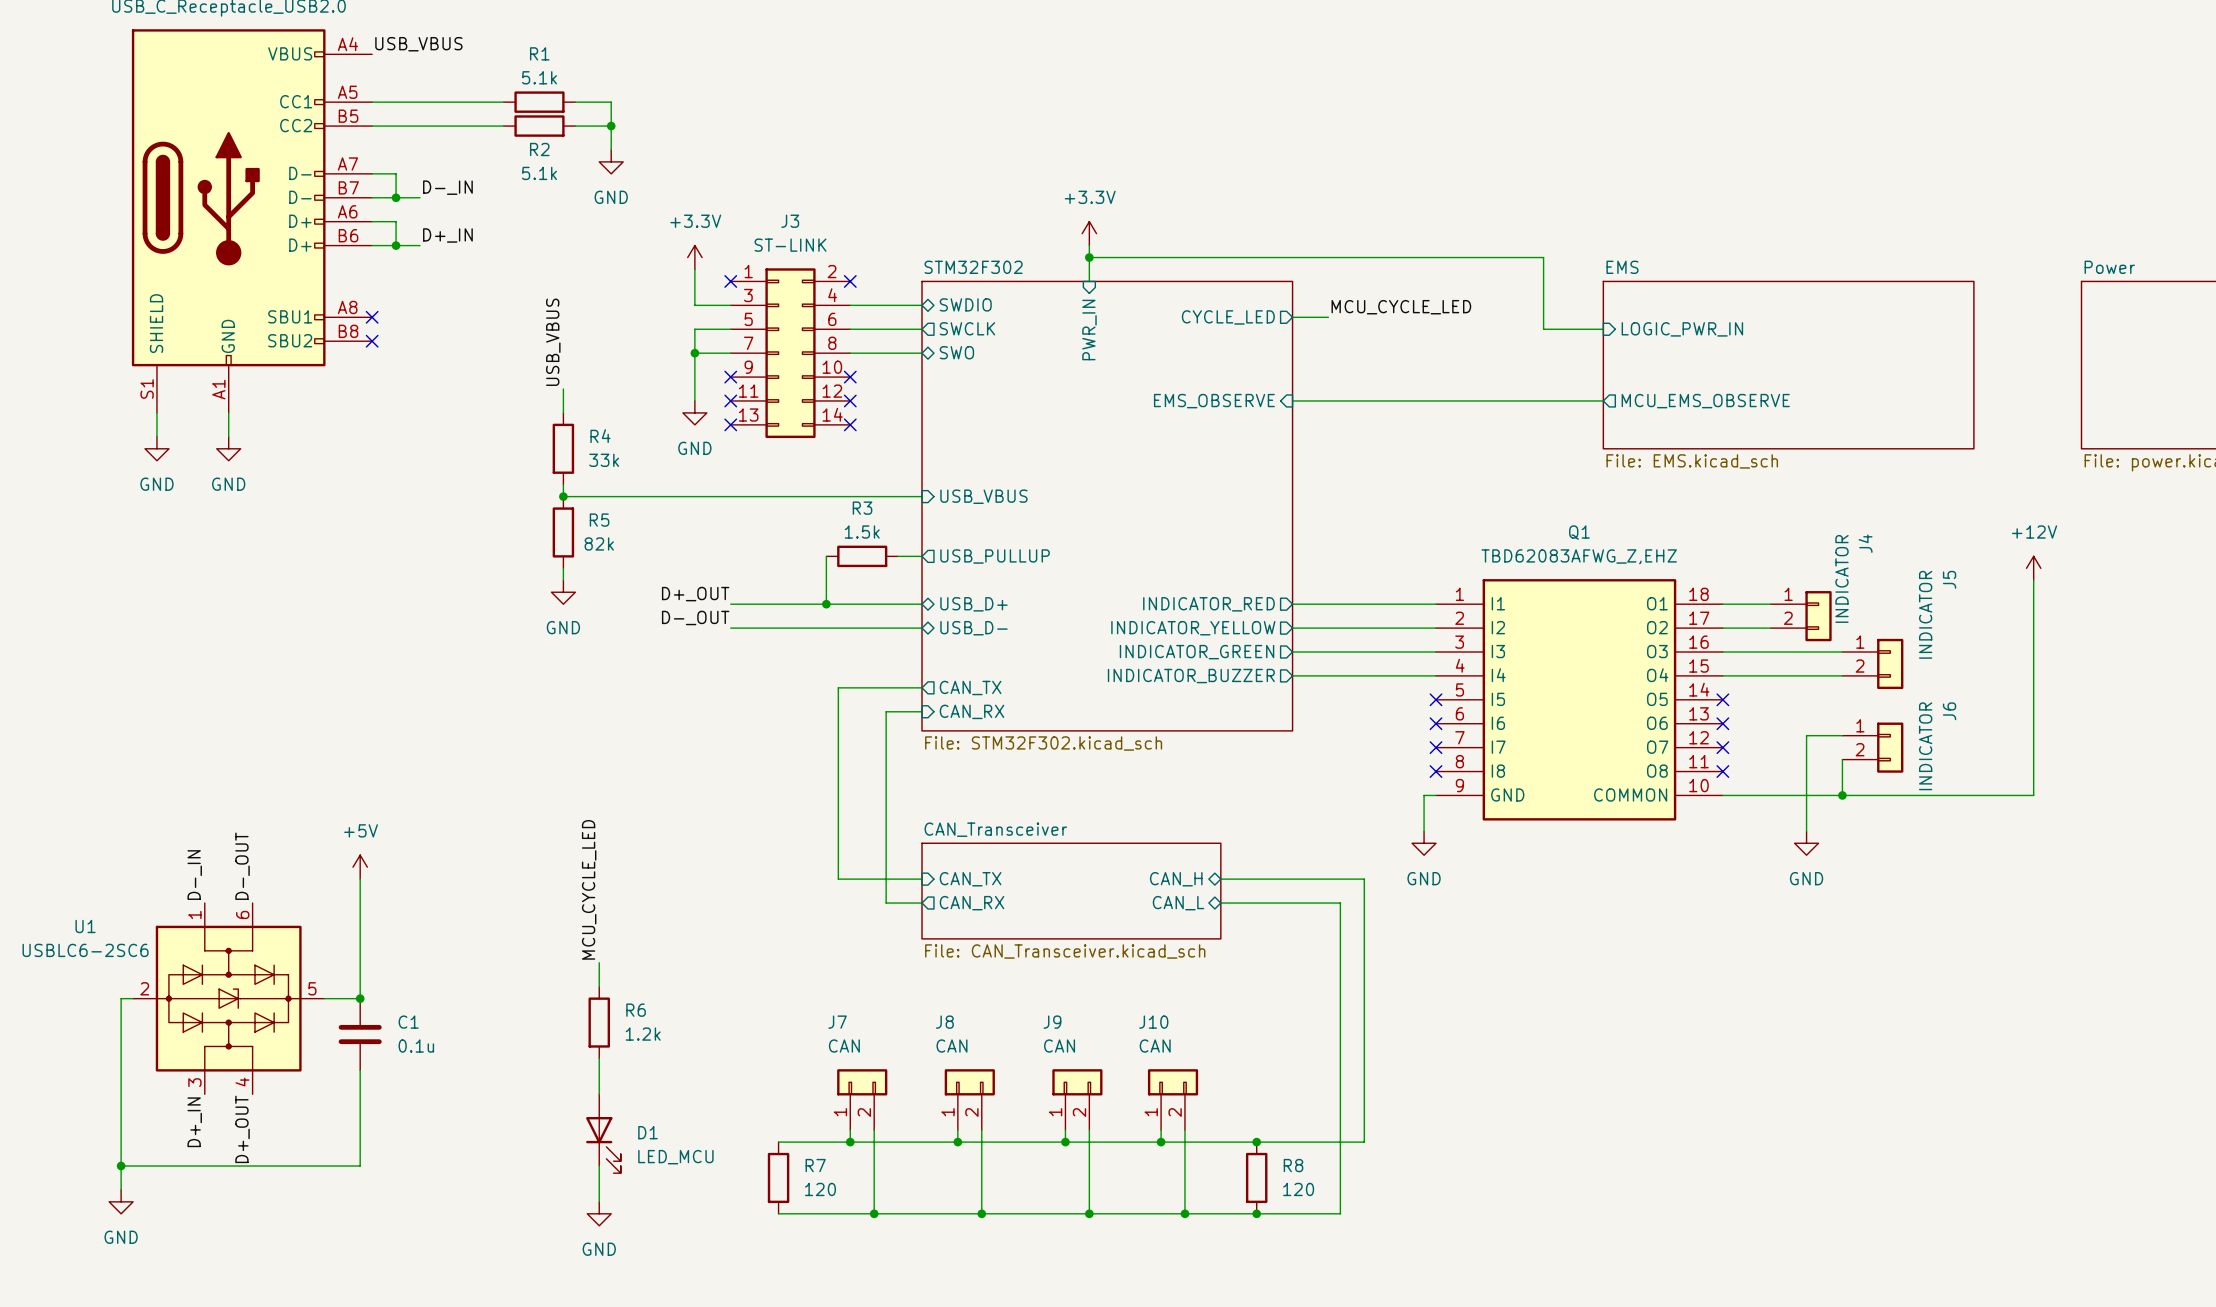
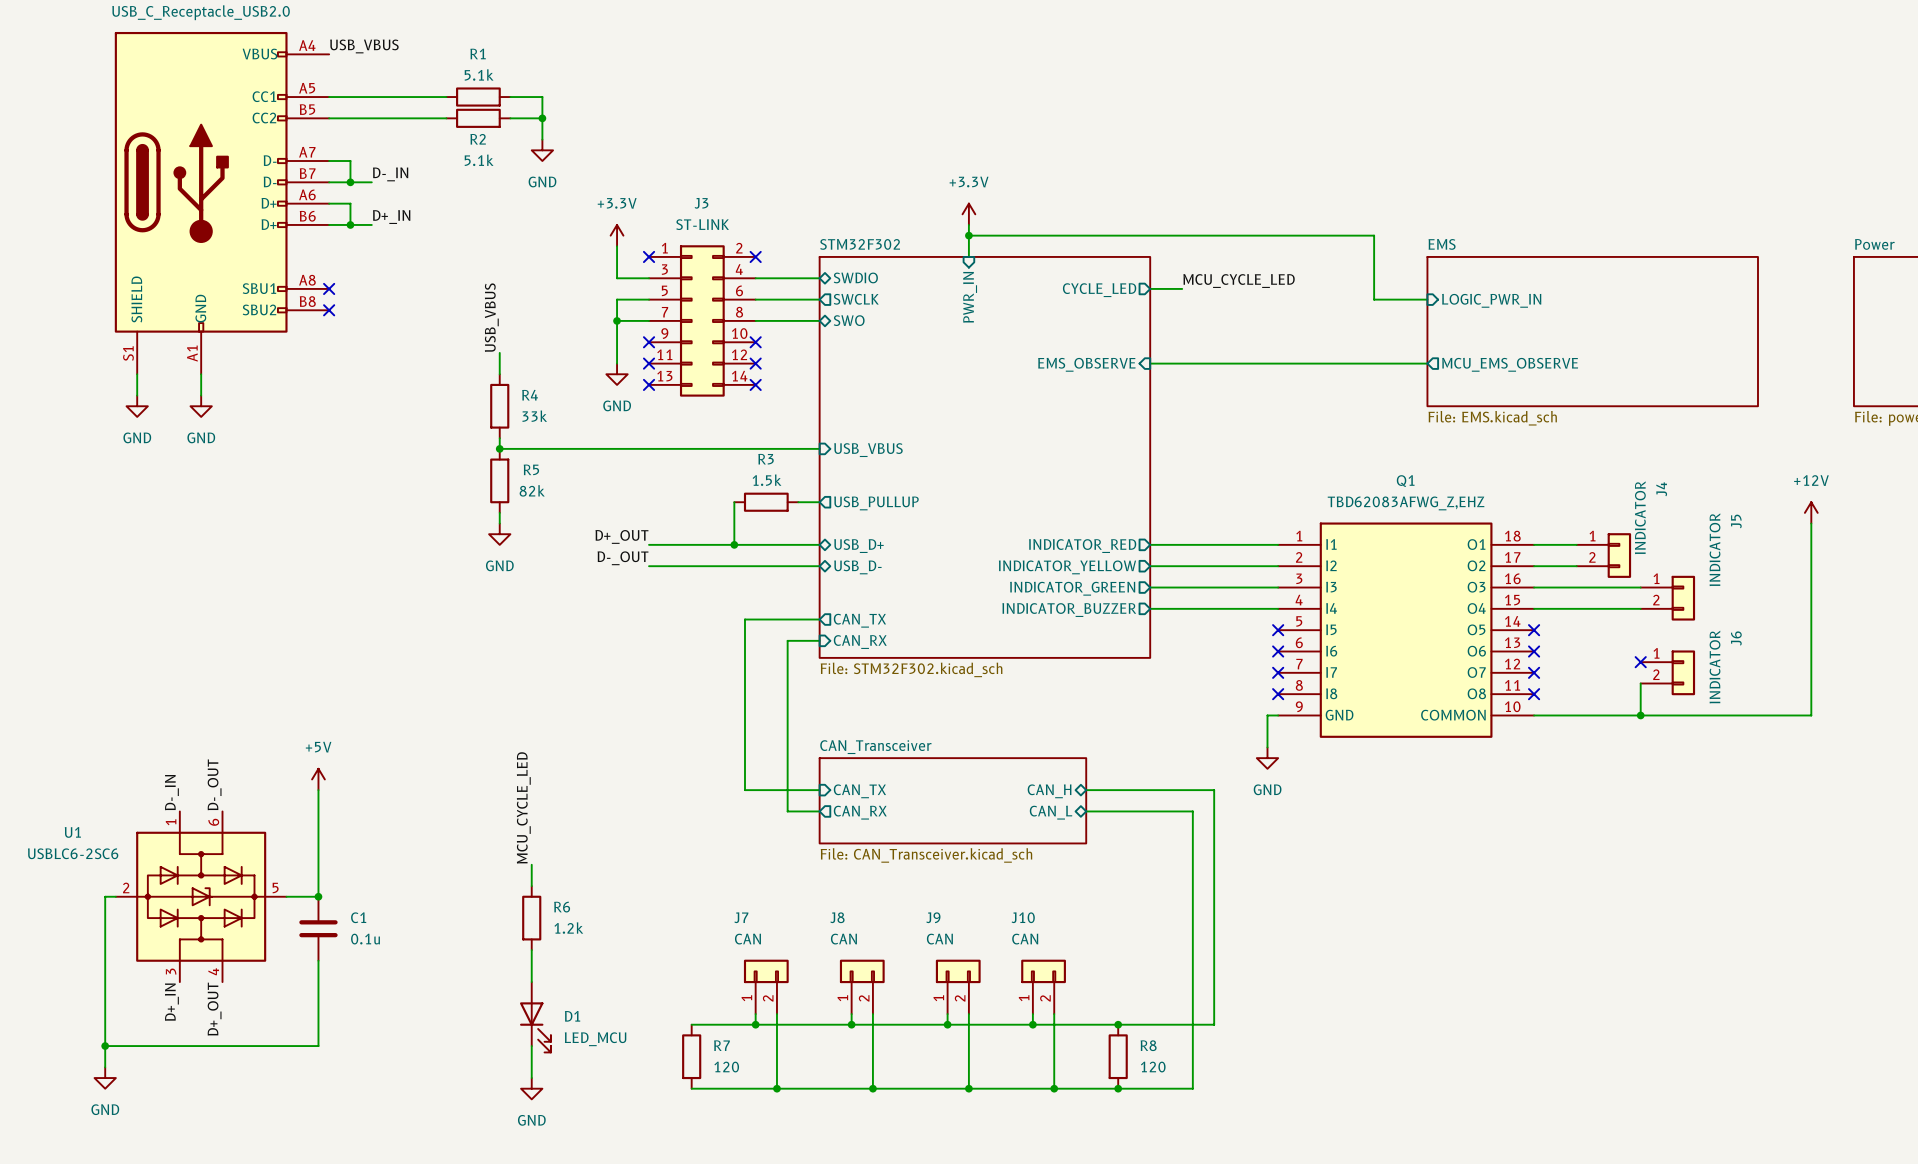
wire: (1842, 735) (1806, 735) (1806, 831) -> none
no-connect mark: none -> (1640, 662)
power symbol: GND (1806, 843) -> none

